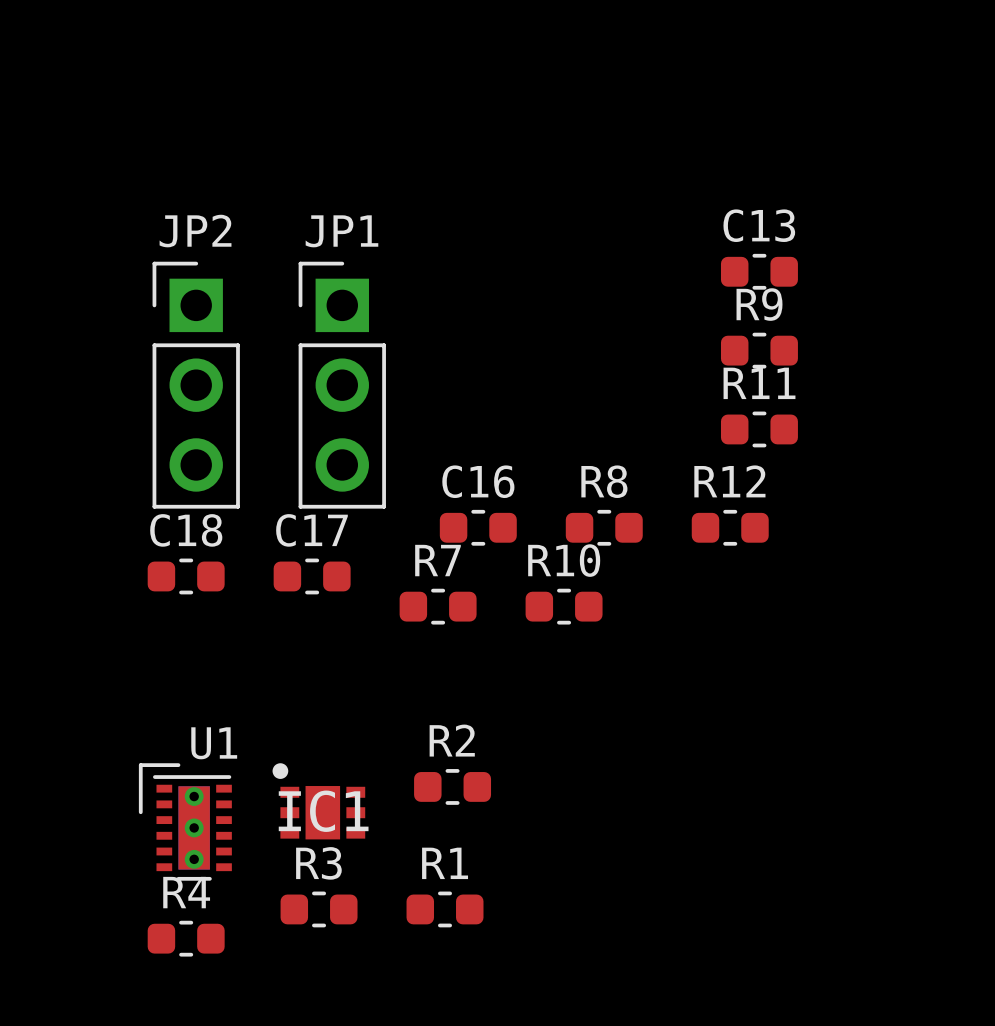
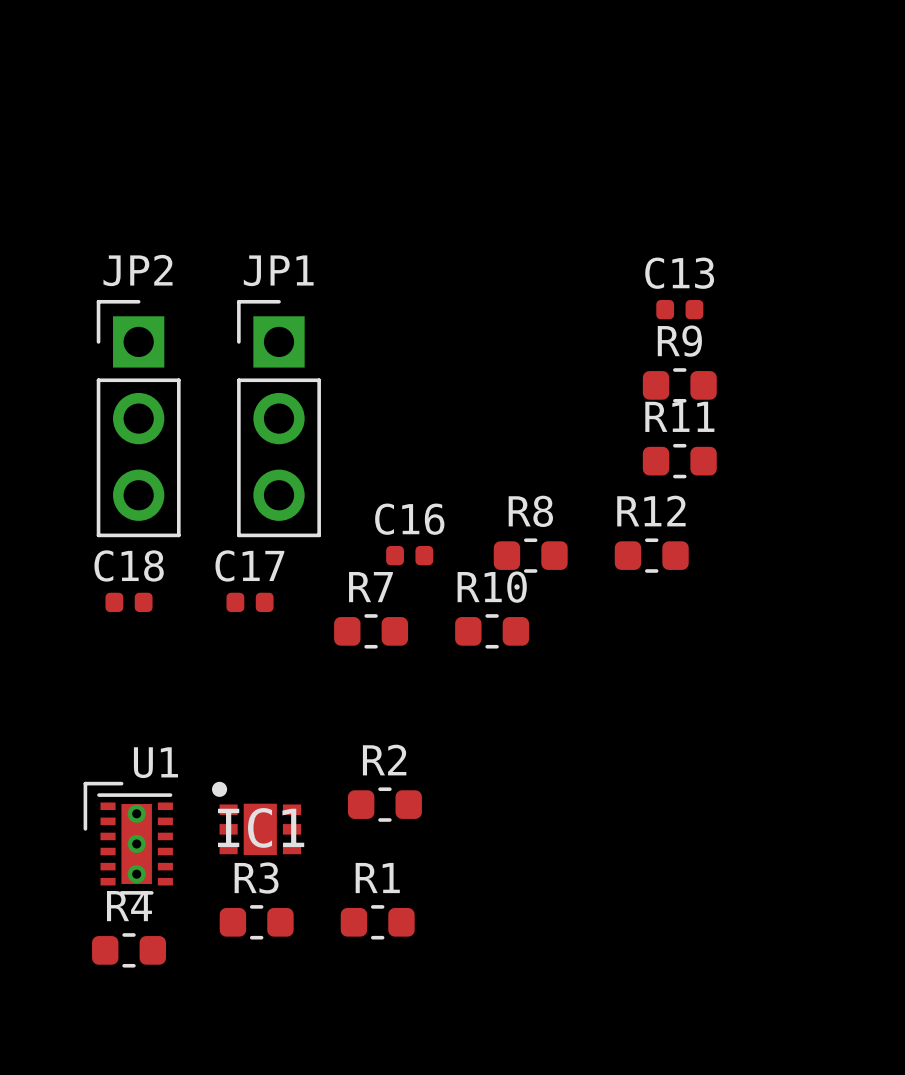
C13 footprint: [720, 253, 798, 290] -> [656, 299, 704, 320]
C16 footprint: [439, 509, 517, 546] -> [386, 545, 434, 566]
C18 footprint: [147, 558, 225, 595] -> [105, 592, 153, 613]
C17 footprint: [273, 558, 351, 595] -> [226, 592, 274, 613]

